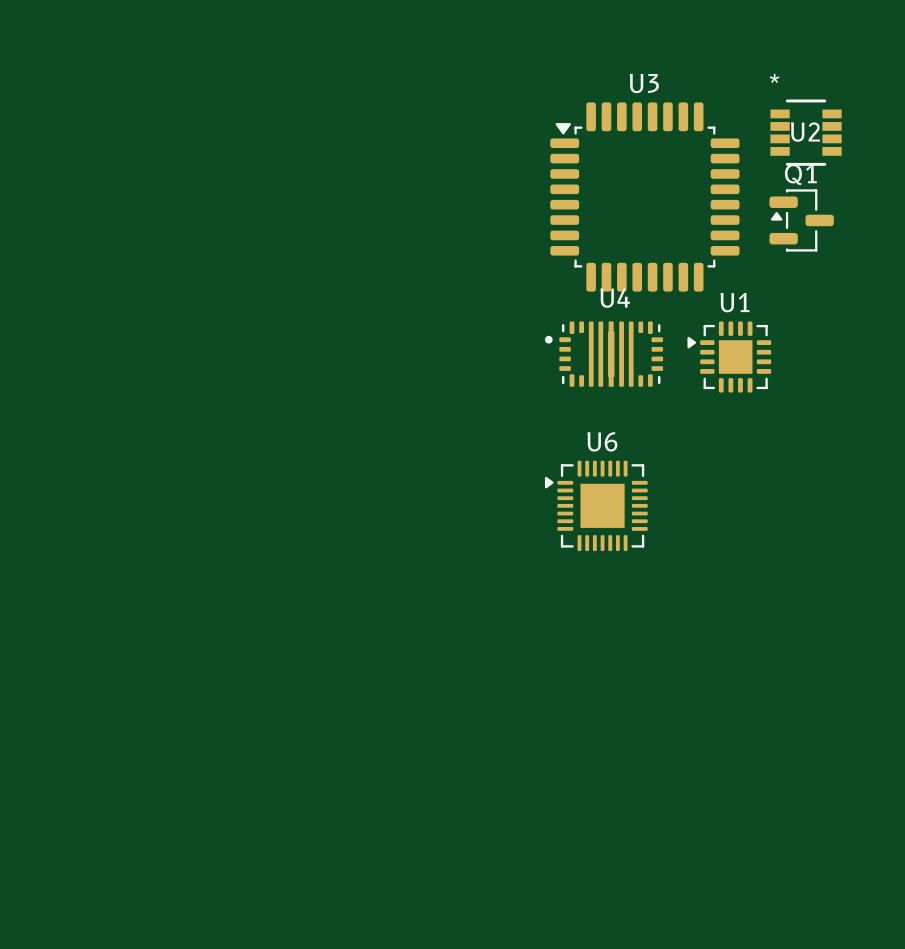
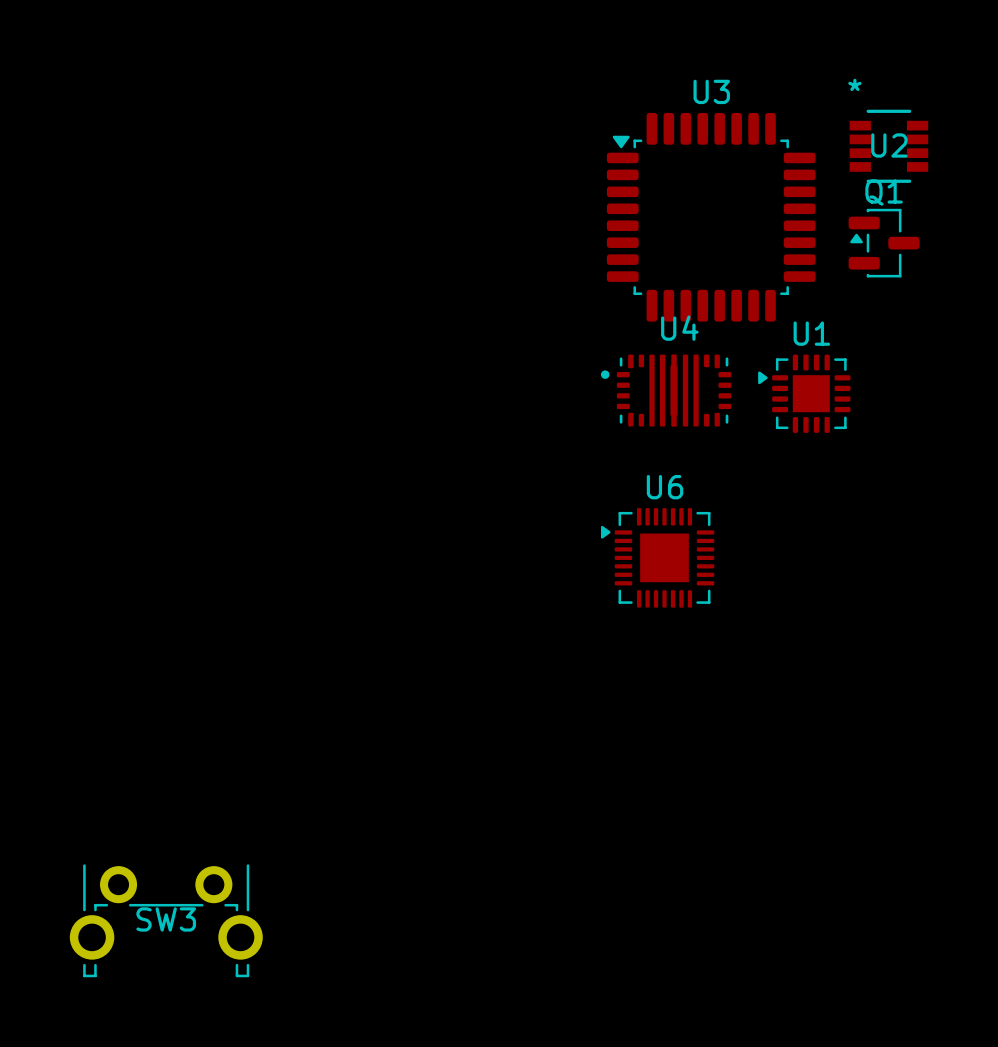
SW3: none -> (166, 920)

